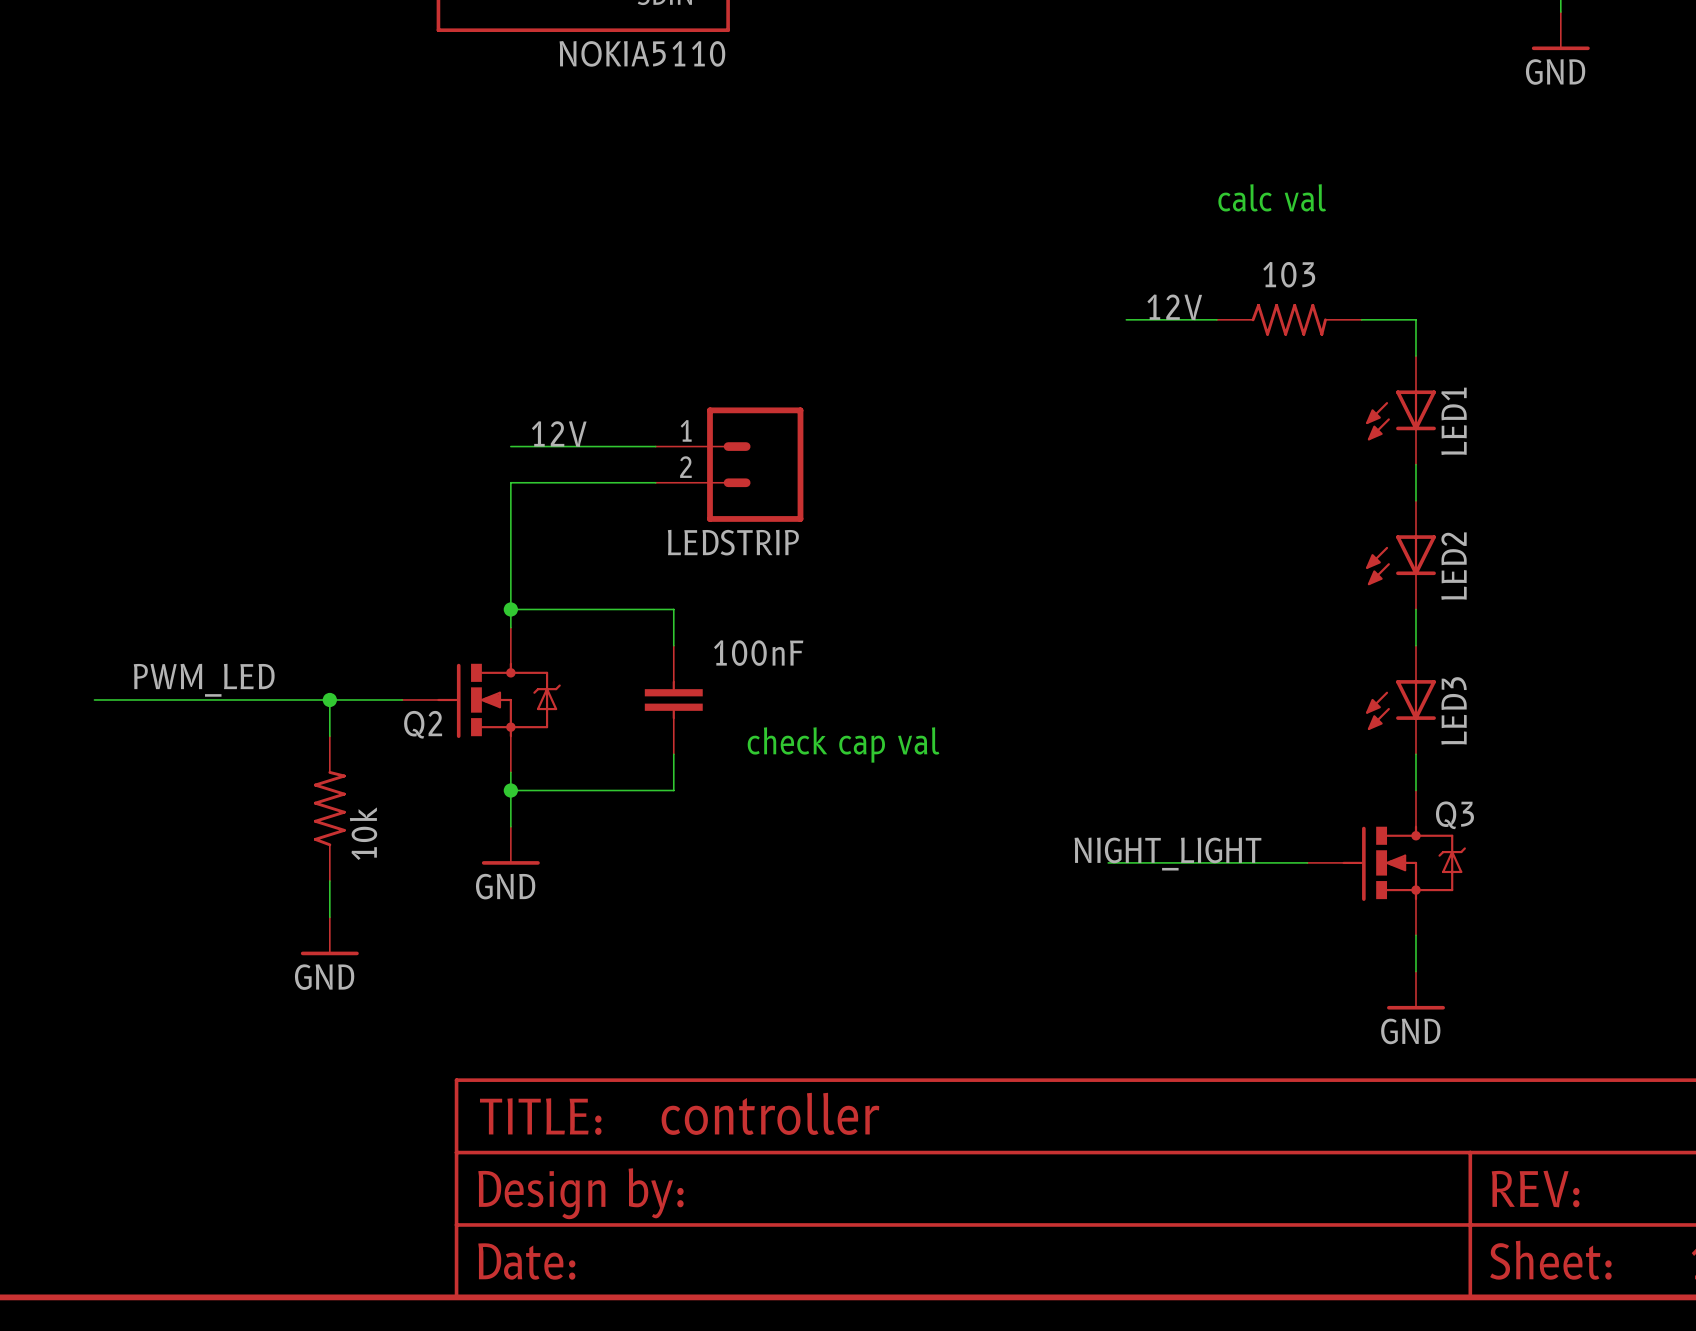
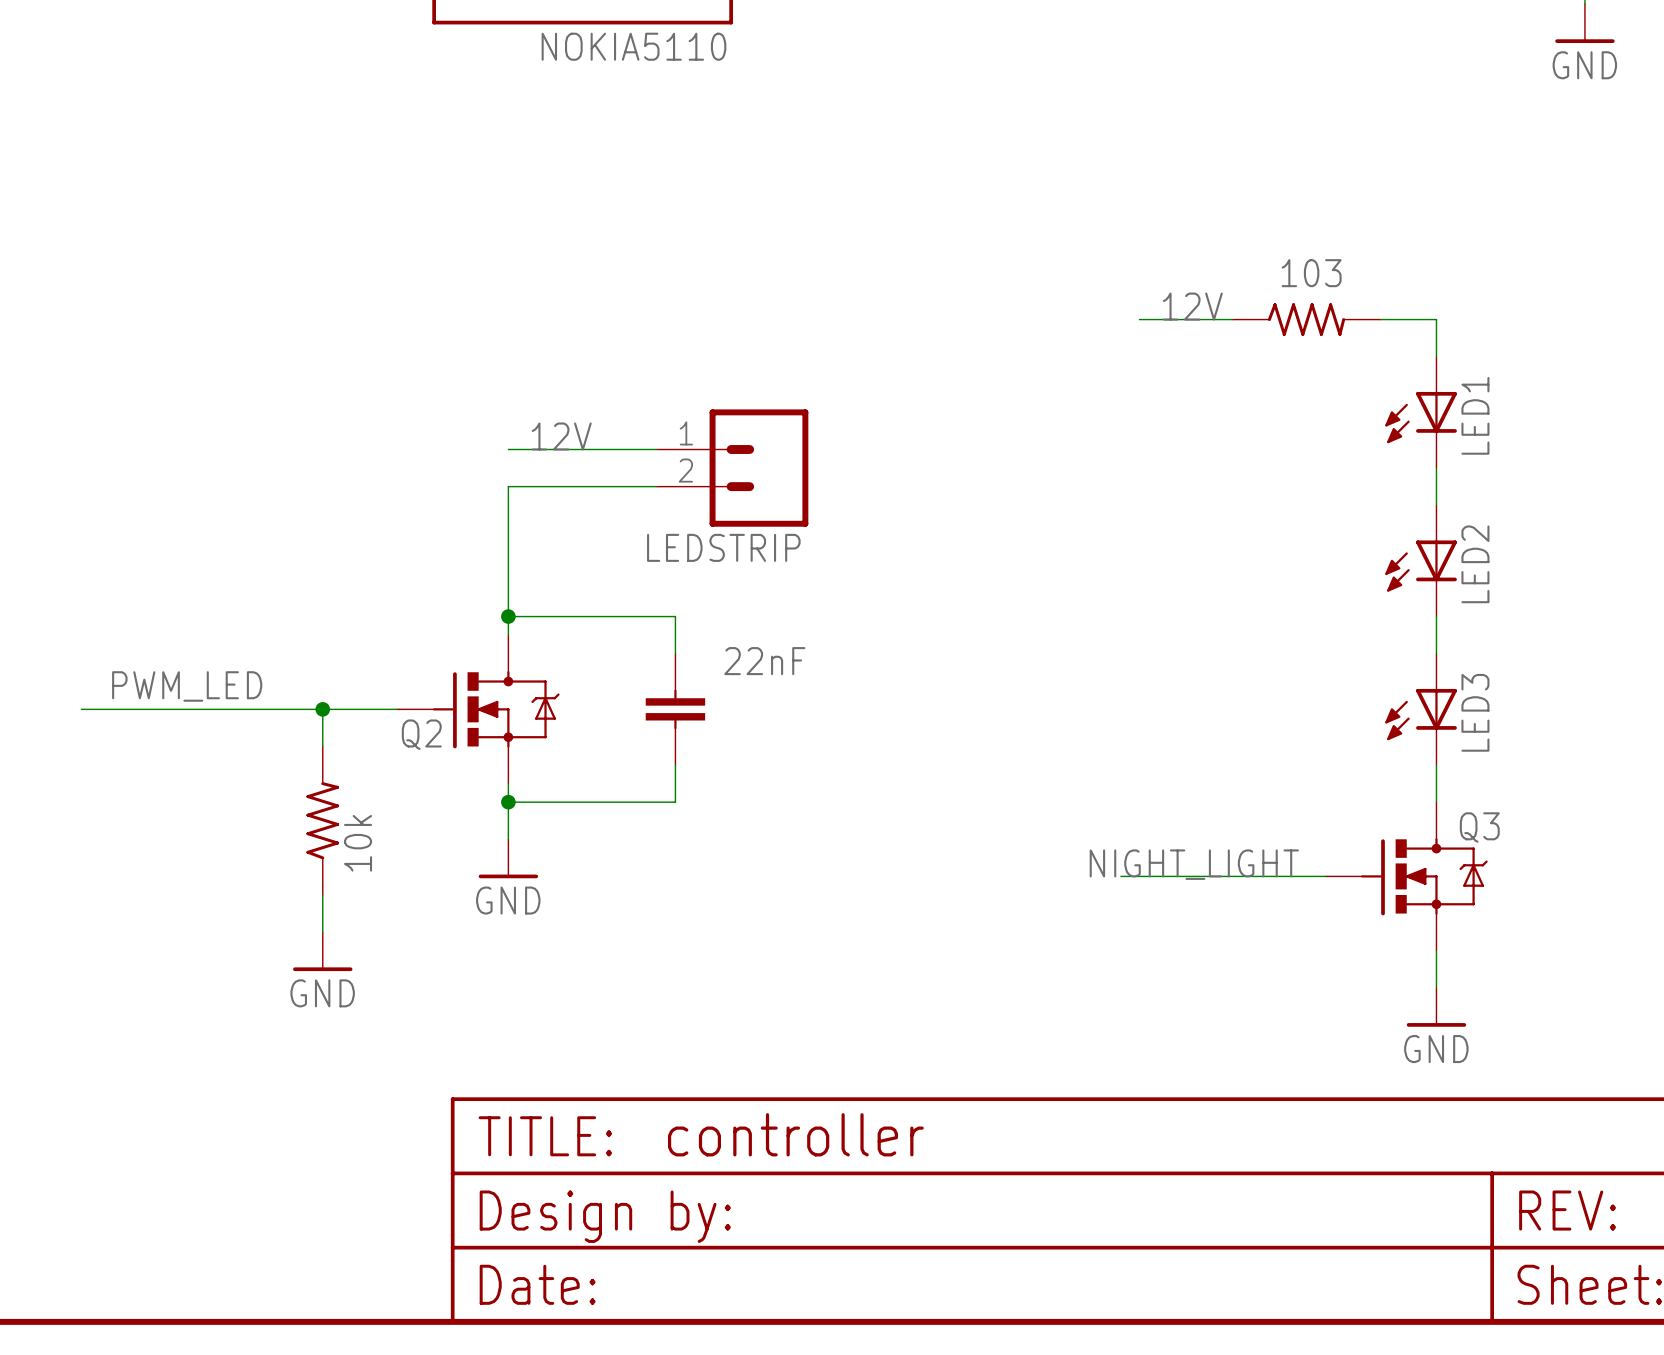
text: calc val (1272, 197) -> none
part value: 100nF (758, 653) -> 22nF (764, 661)
text: check cap val (843, 744) -> none

